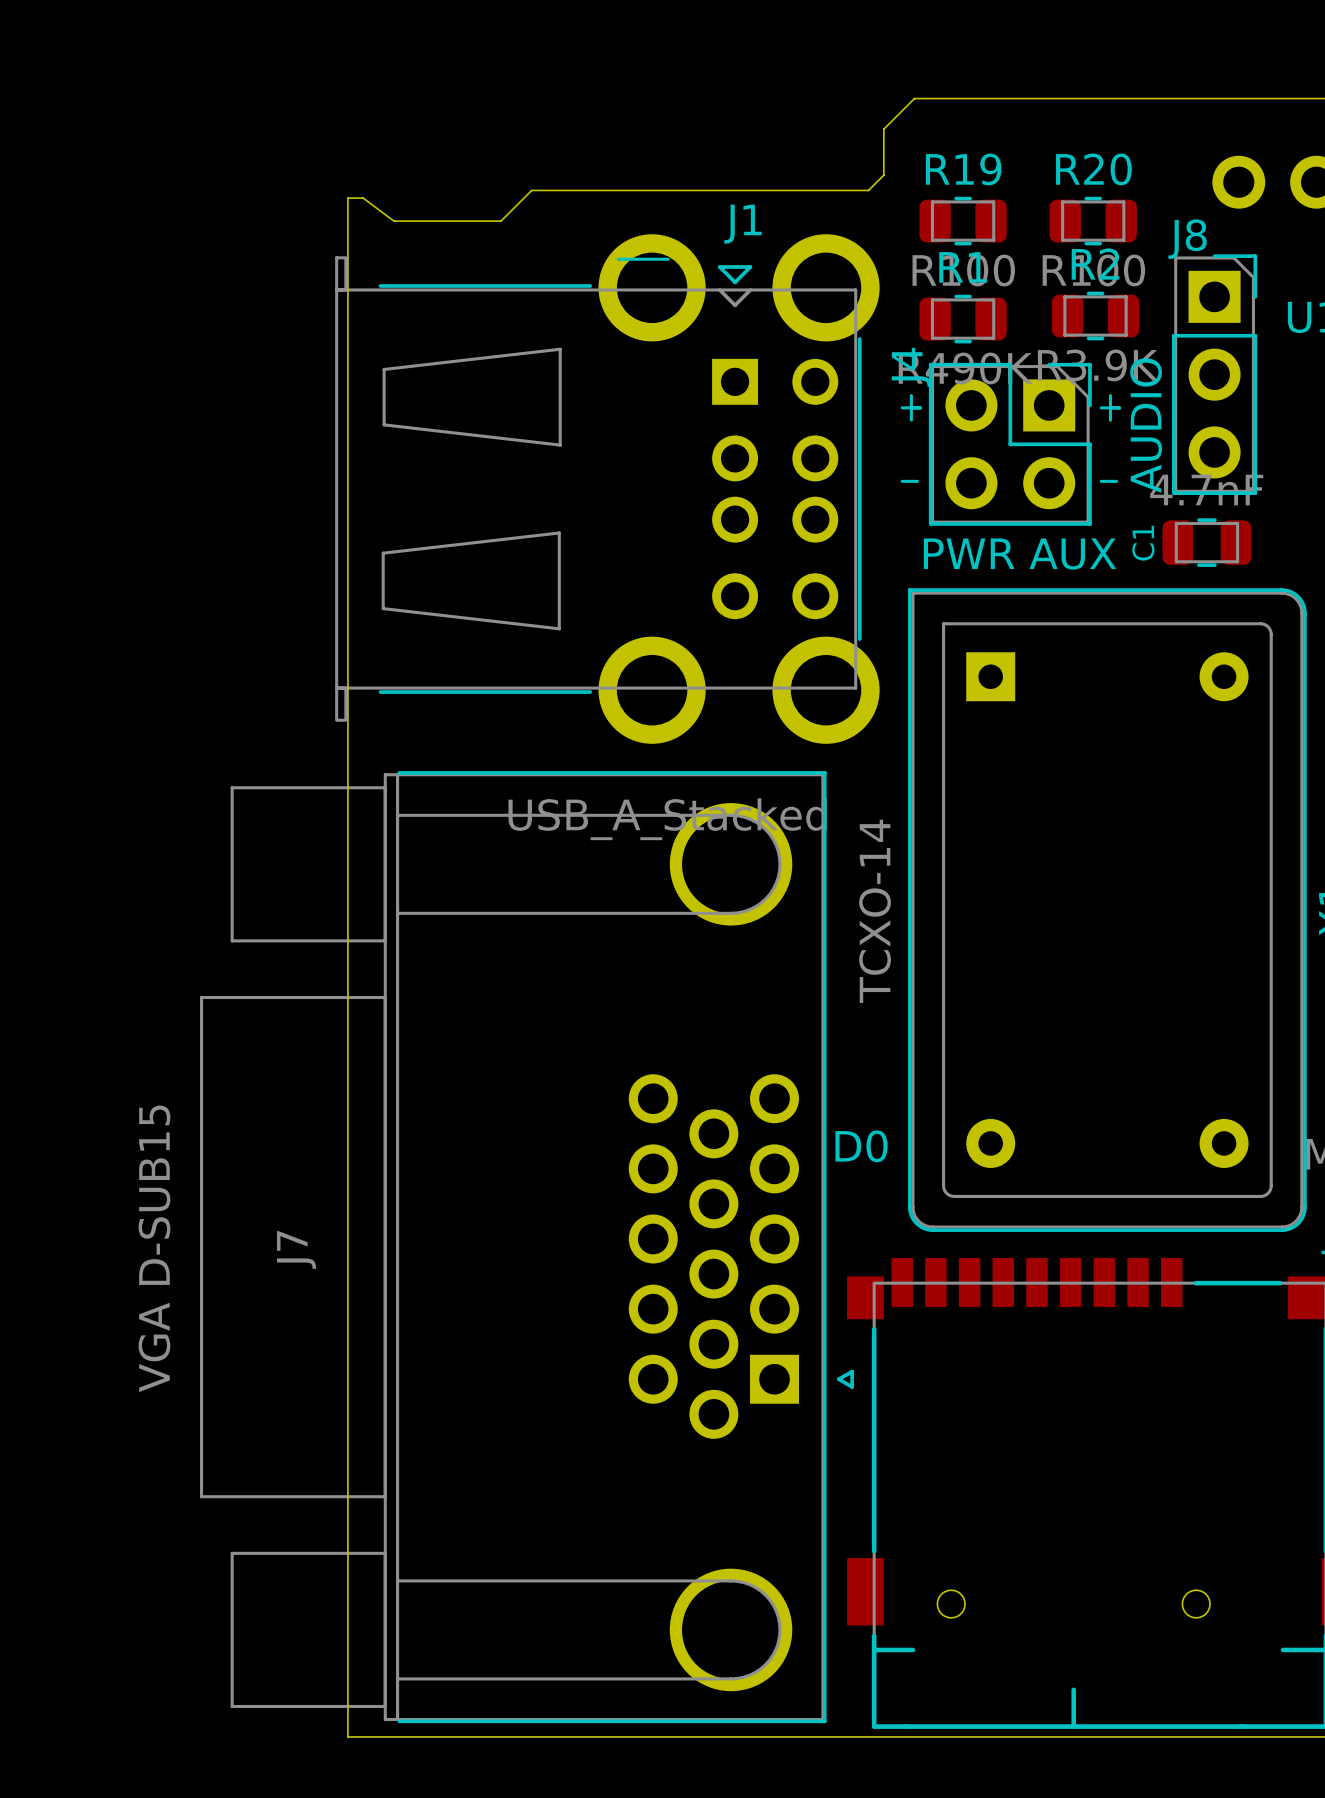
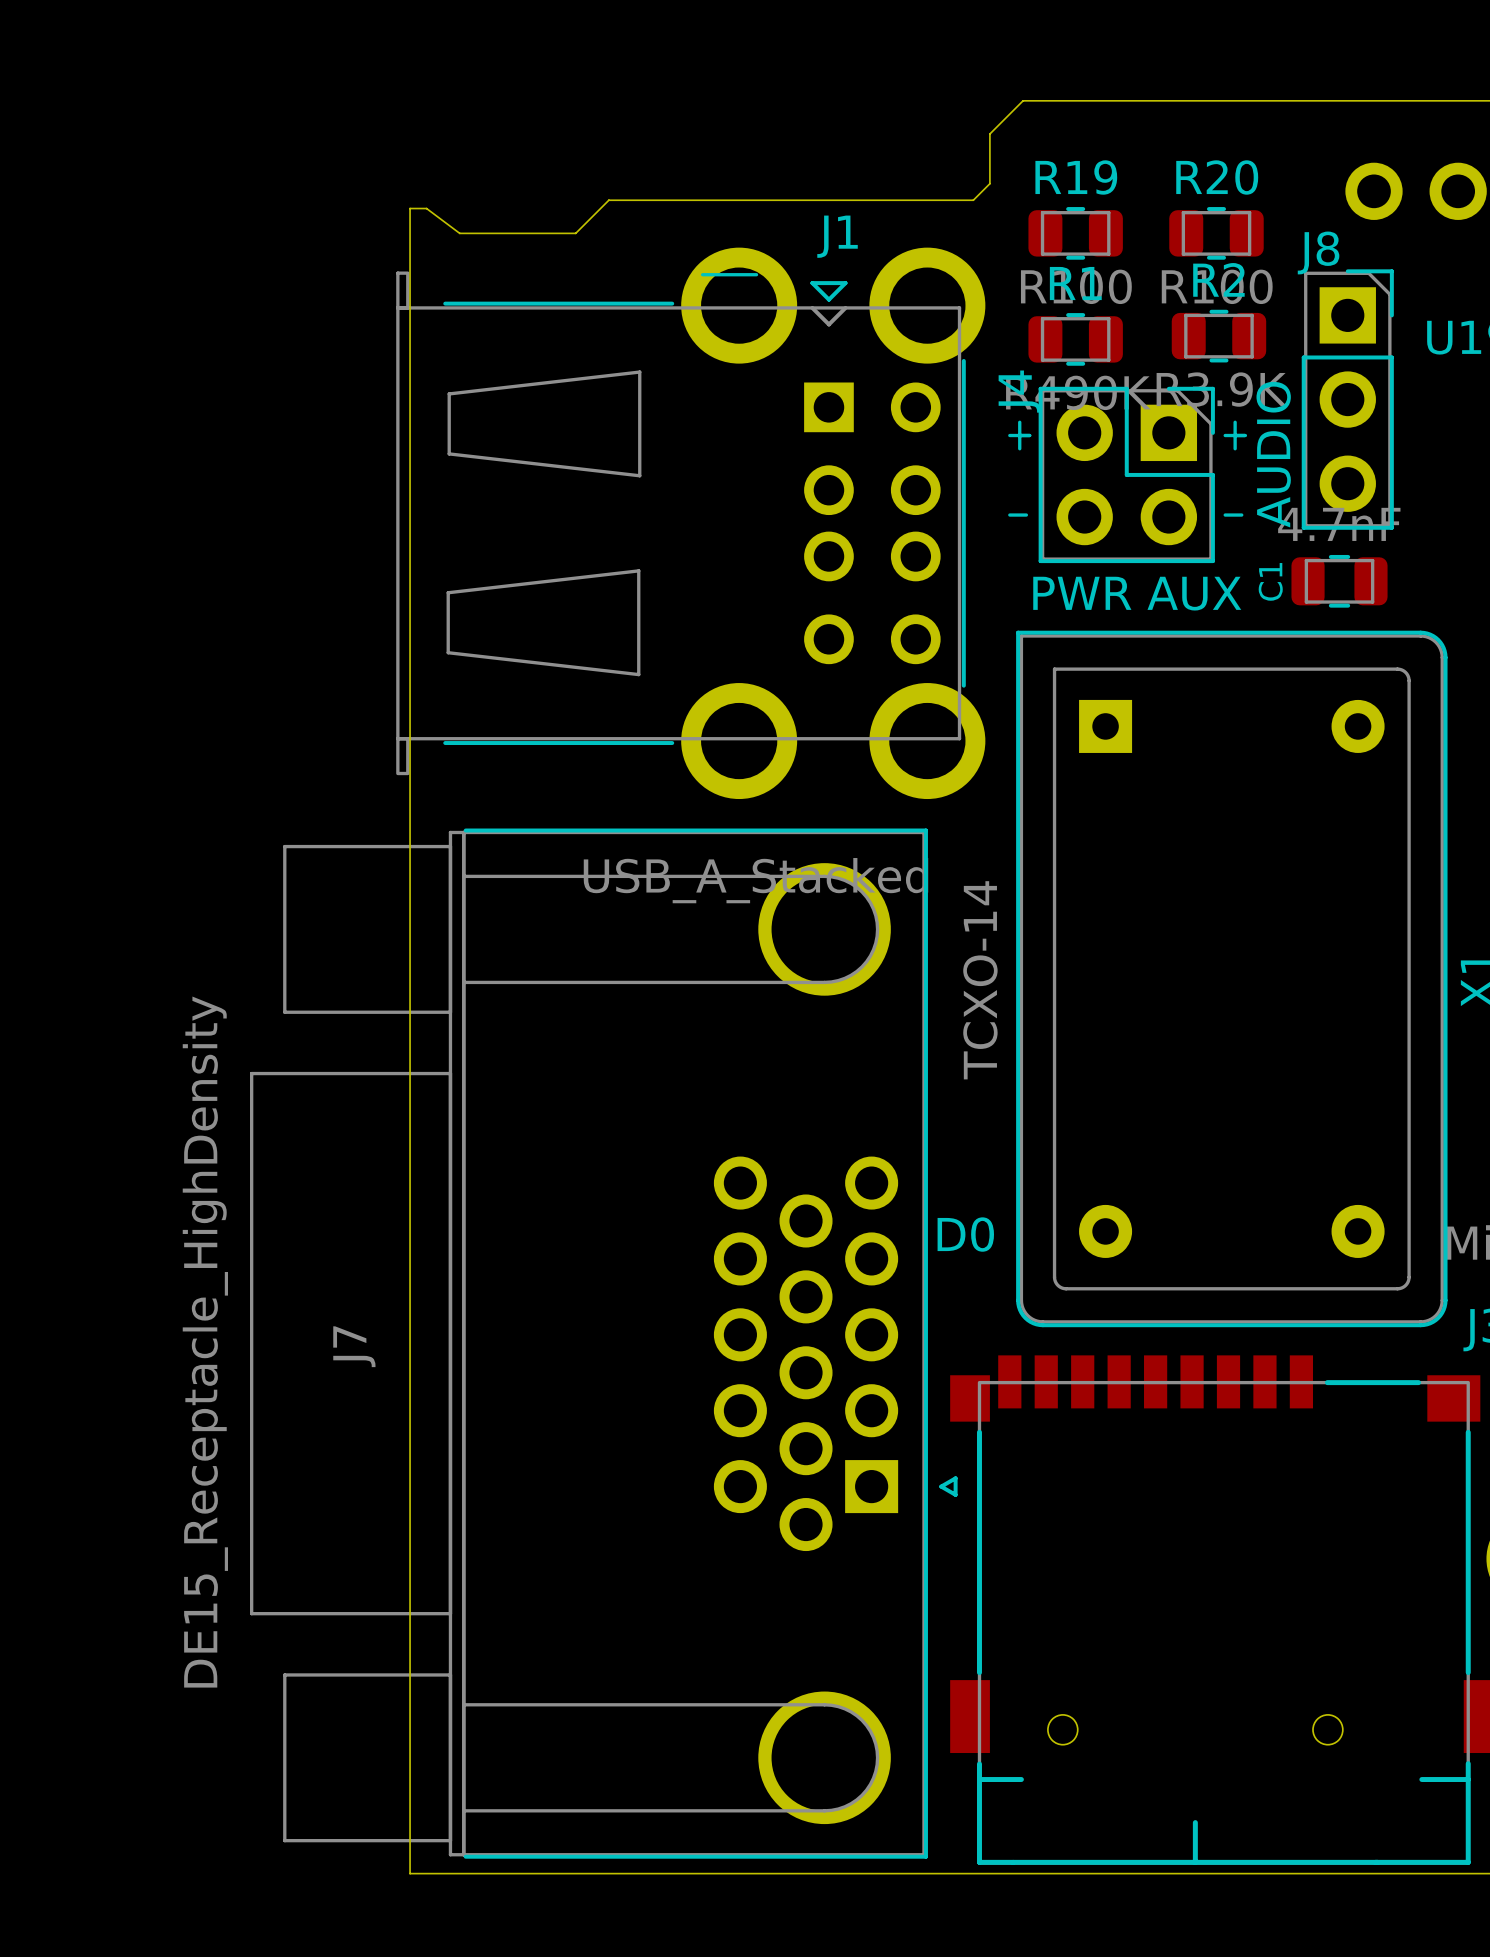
J7 value: VGA D-SUB15 (154, 1248) -> DE15_Receptacle_HighDensity (205, 1342)

